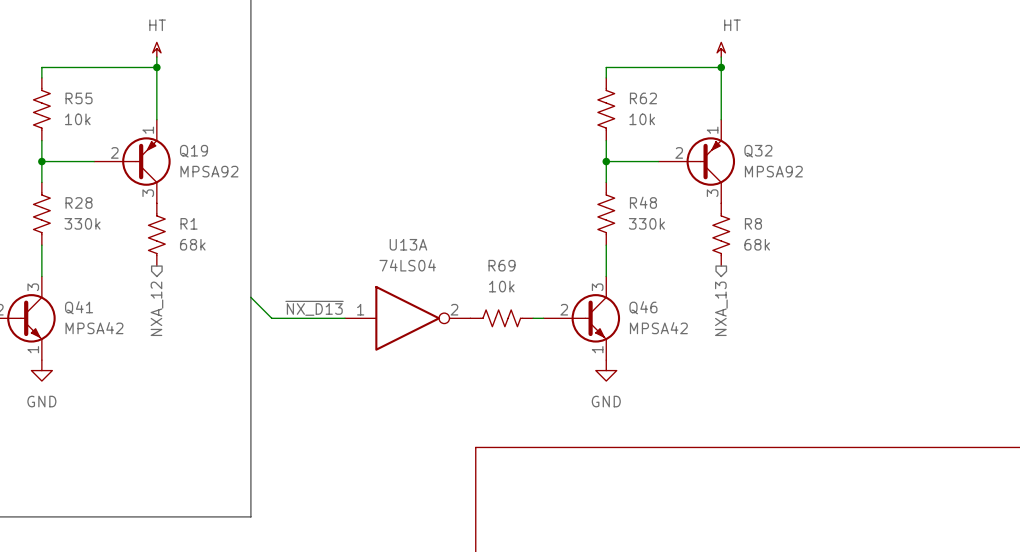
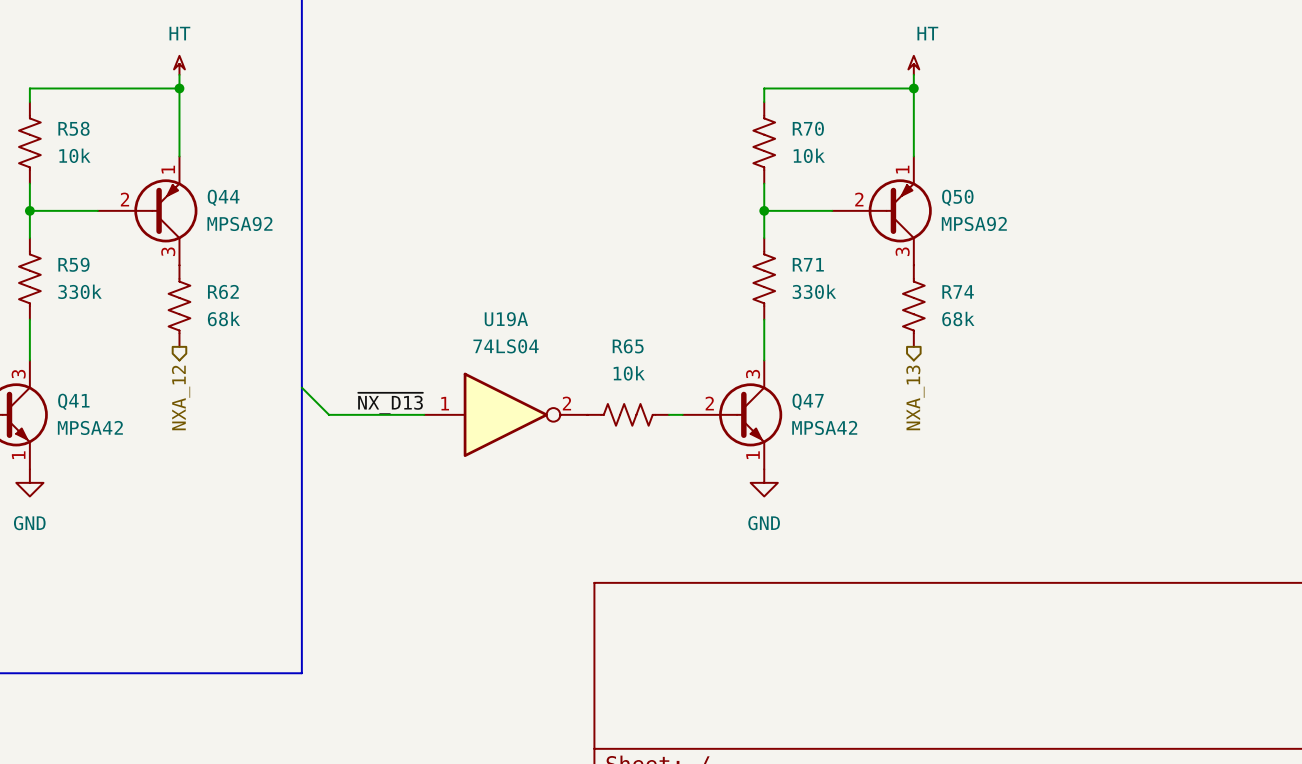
R55 name: R55 (79, 98) -> R58 (73, 128)
R62 name: R62 (643, 98) -> R70 (808, 128)
Q19 name: Q19 (194, 151) -> Q44 (223, 197)
Q32 name: Q32 (758, 151) -> Q50 (957, 197)
R28 name: R28 (79, 202) -> R59 (73, 264)
R48 name: R48 (643, 202) -> R71 (808, 264)
R1 name: R1 (189, 223) -> R62 (223, 291)
R8 name: R8 (753, 223) -> R74 (958, 291)
U13A name: U13A (408, 244) -> U19A (506, 319)
R69 name: R69 (502, 265) -> R65 (628, 346)
Q46 name: Q46 (643, 307) -> Q47 (808, 401)

